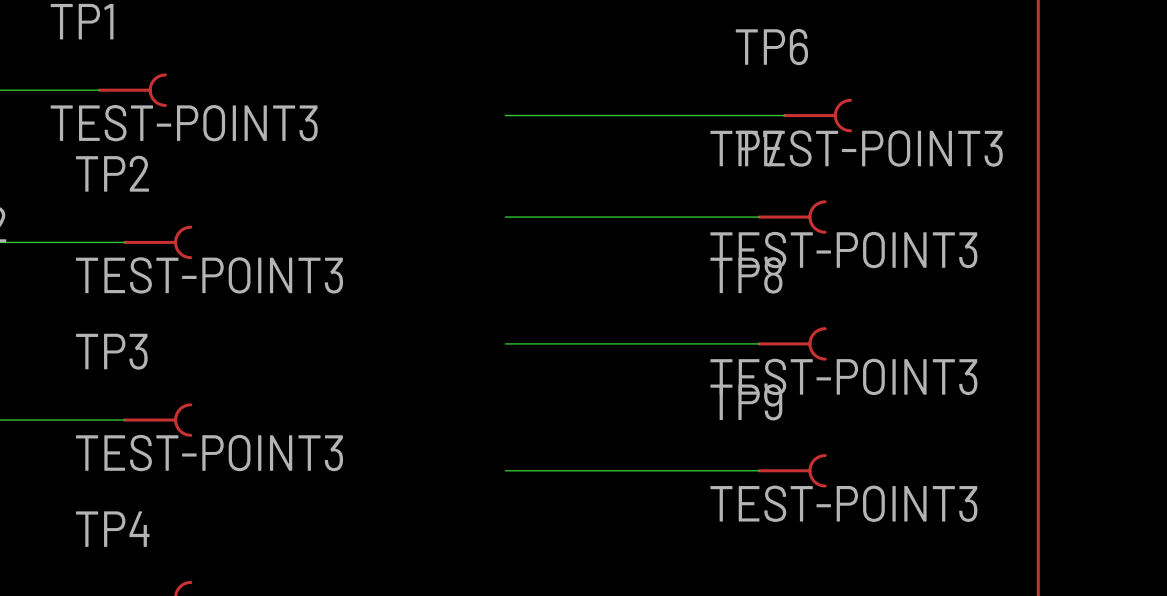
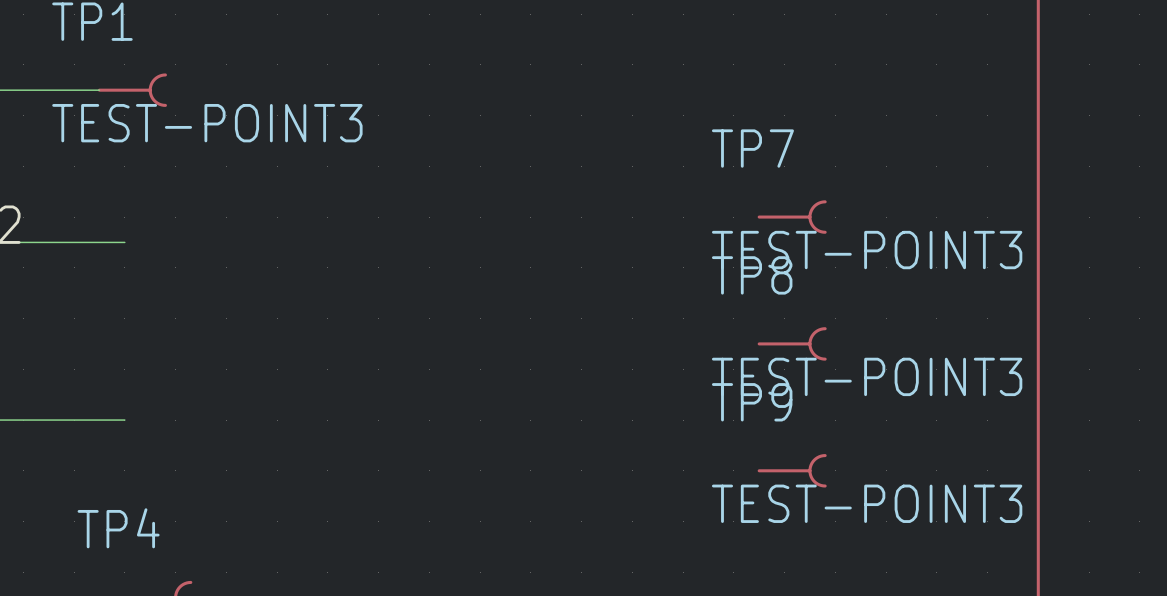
wire: (505, 115) (784, 115) -> none
TP6: TEST-POINT3 (817, 115) -> none
wire: (505, 217) (759, 217) -> none
TP2: TEST-POINT3 (157, 242) -> none
wire: (505, 343) (759, 343) -> none
TP3: TEST-POINT3 (157, 420) -> none
wire: (505, 470) (759, 470) -> none

